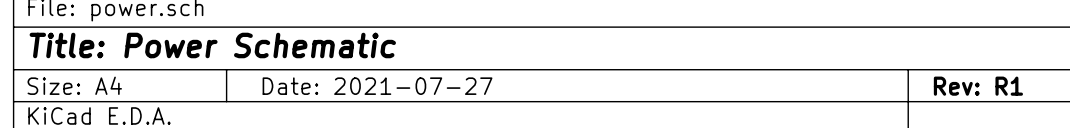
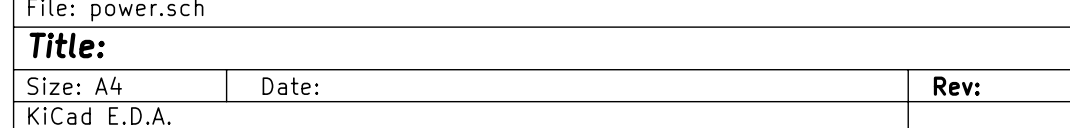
title block: Title: Power Schematic (212, 45) -> Title: (67, 45)
title block: Date: 2021-07-27 (377, 86) -> Date: (290, 86)
title block: Rev: R1 (978, 86) -> Rev: (956, 86)

